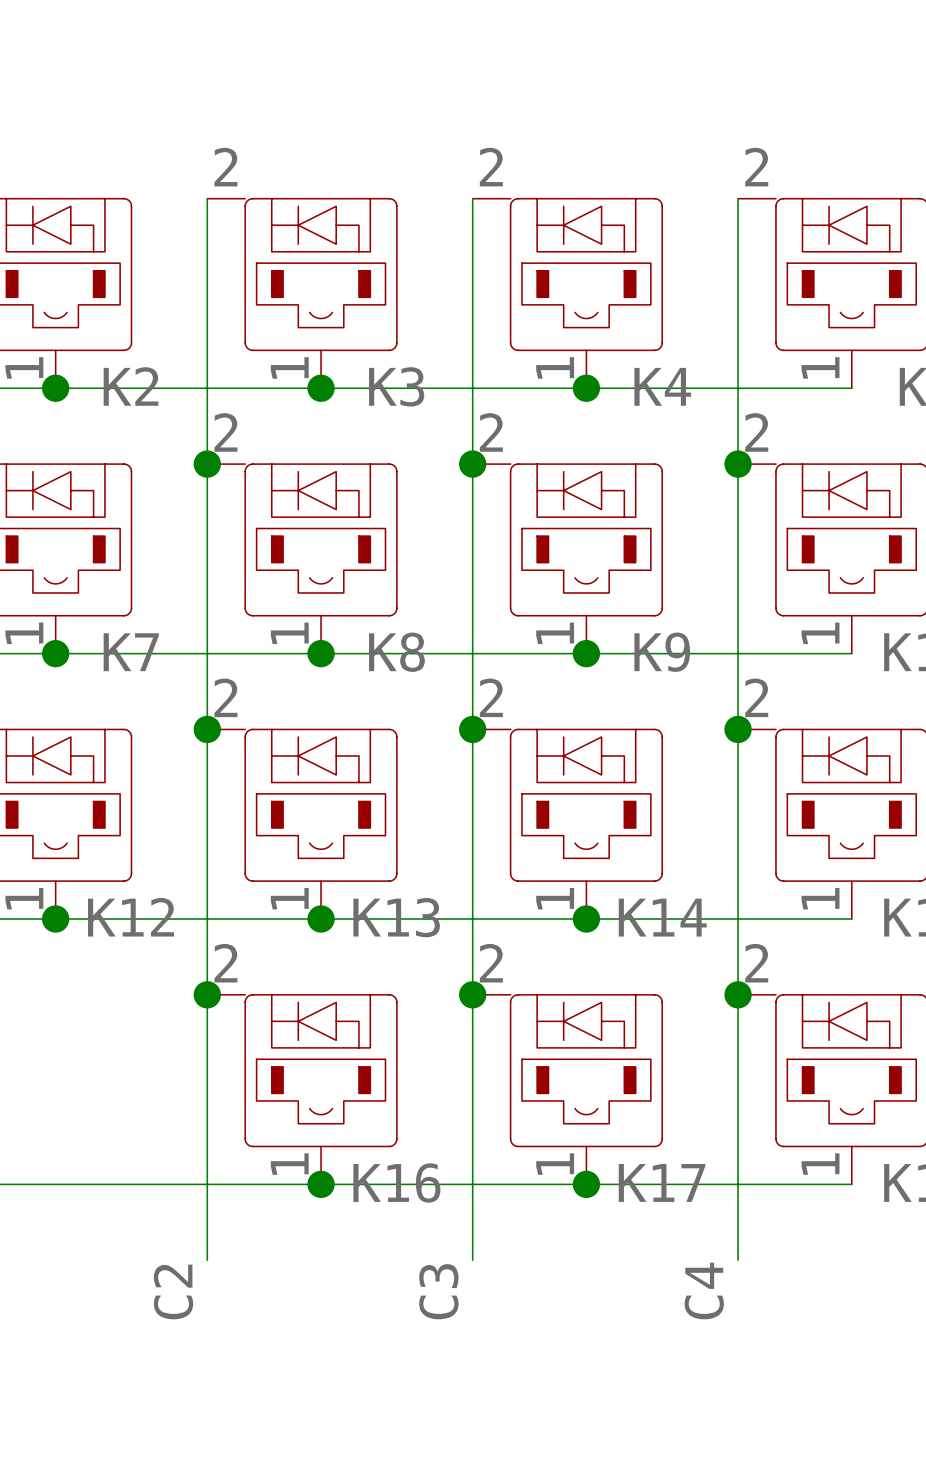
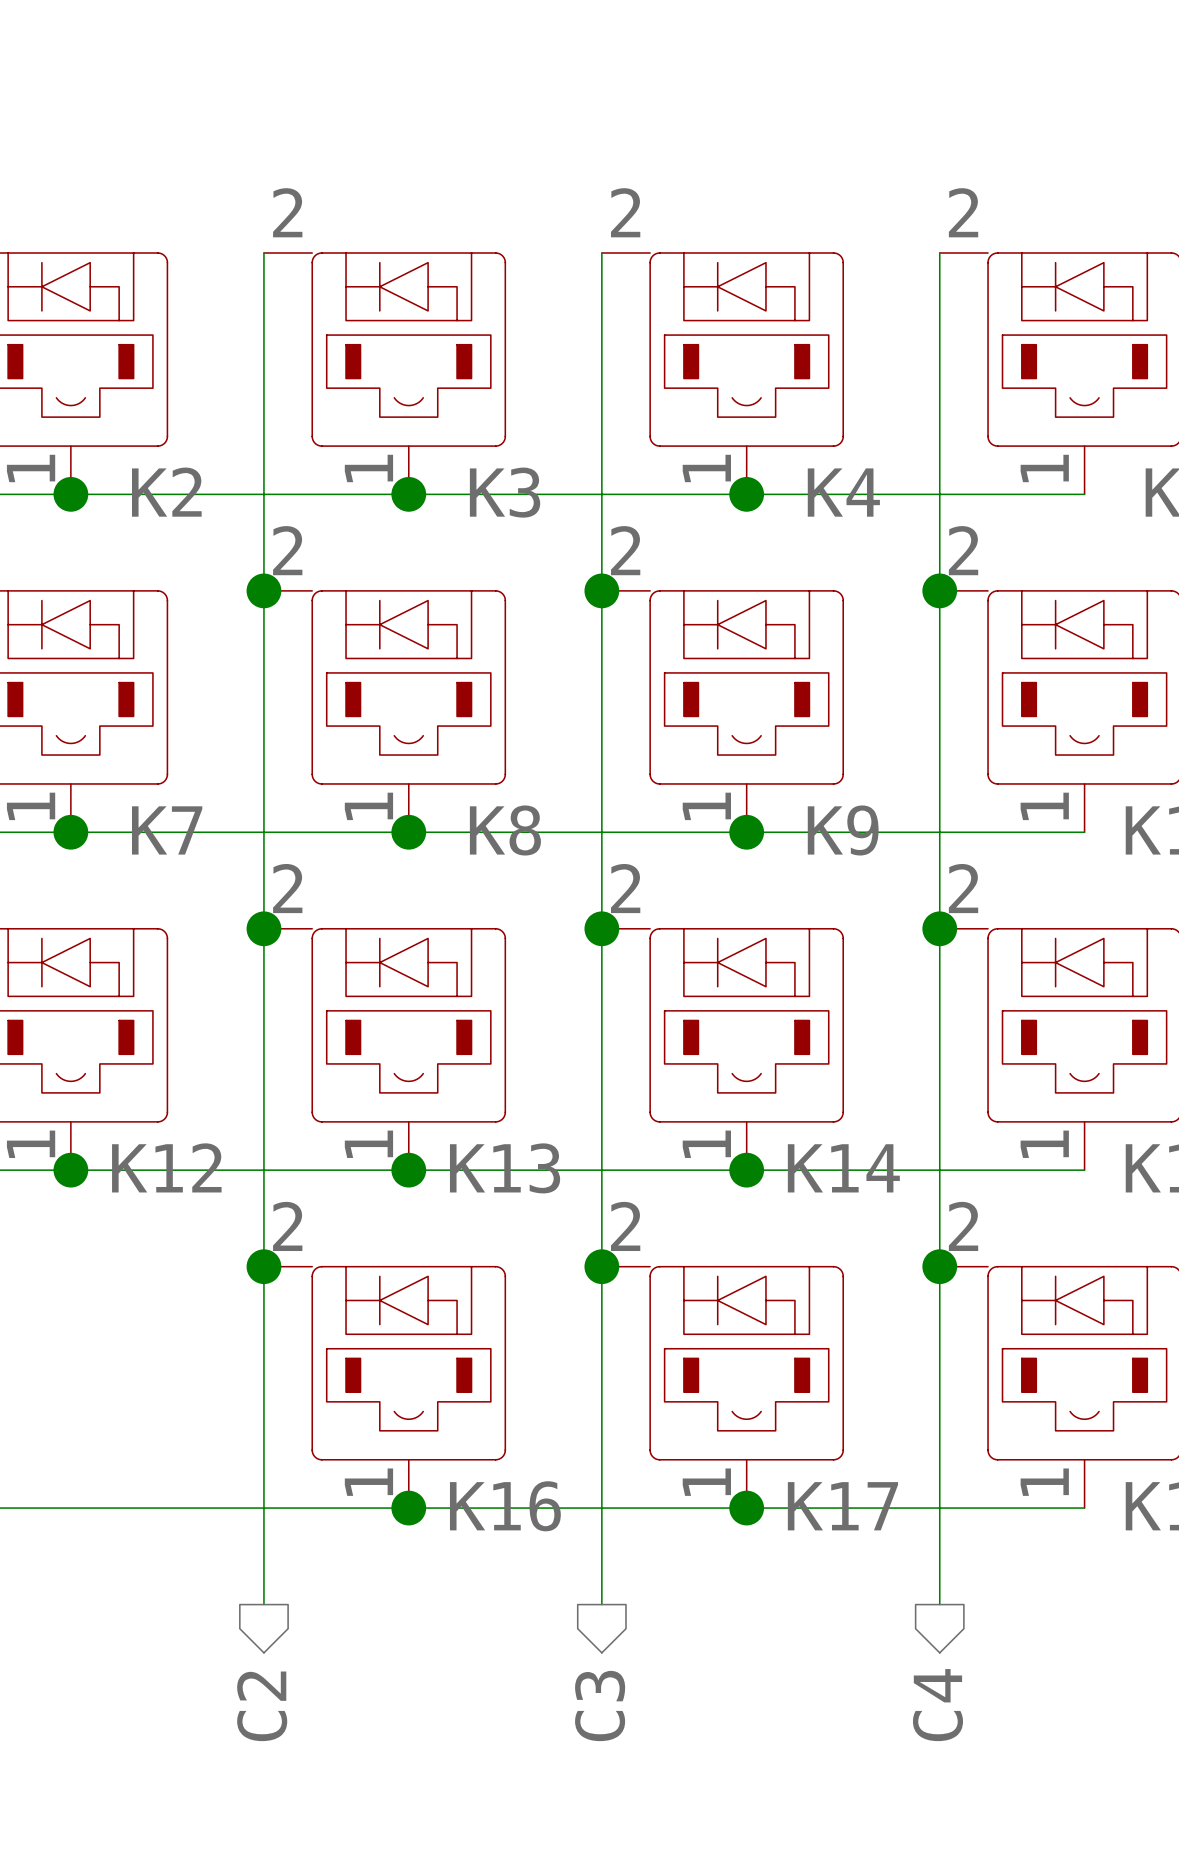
label: C4 (704, 1290) -> none
label: C2 (173, 1291) -> none
label: C3 (438, 1291) -> none
hierarchical label: none -> C3 (600, 1705)
hierarchical label: none -> C4 (937, 1705)
hierarchical label: none -> C2 (262, 1706)

